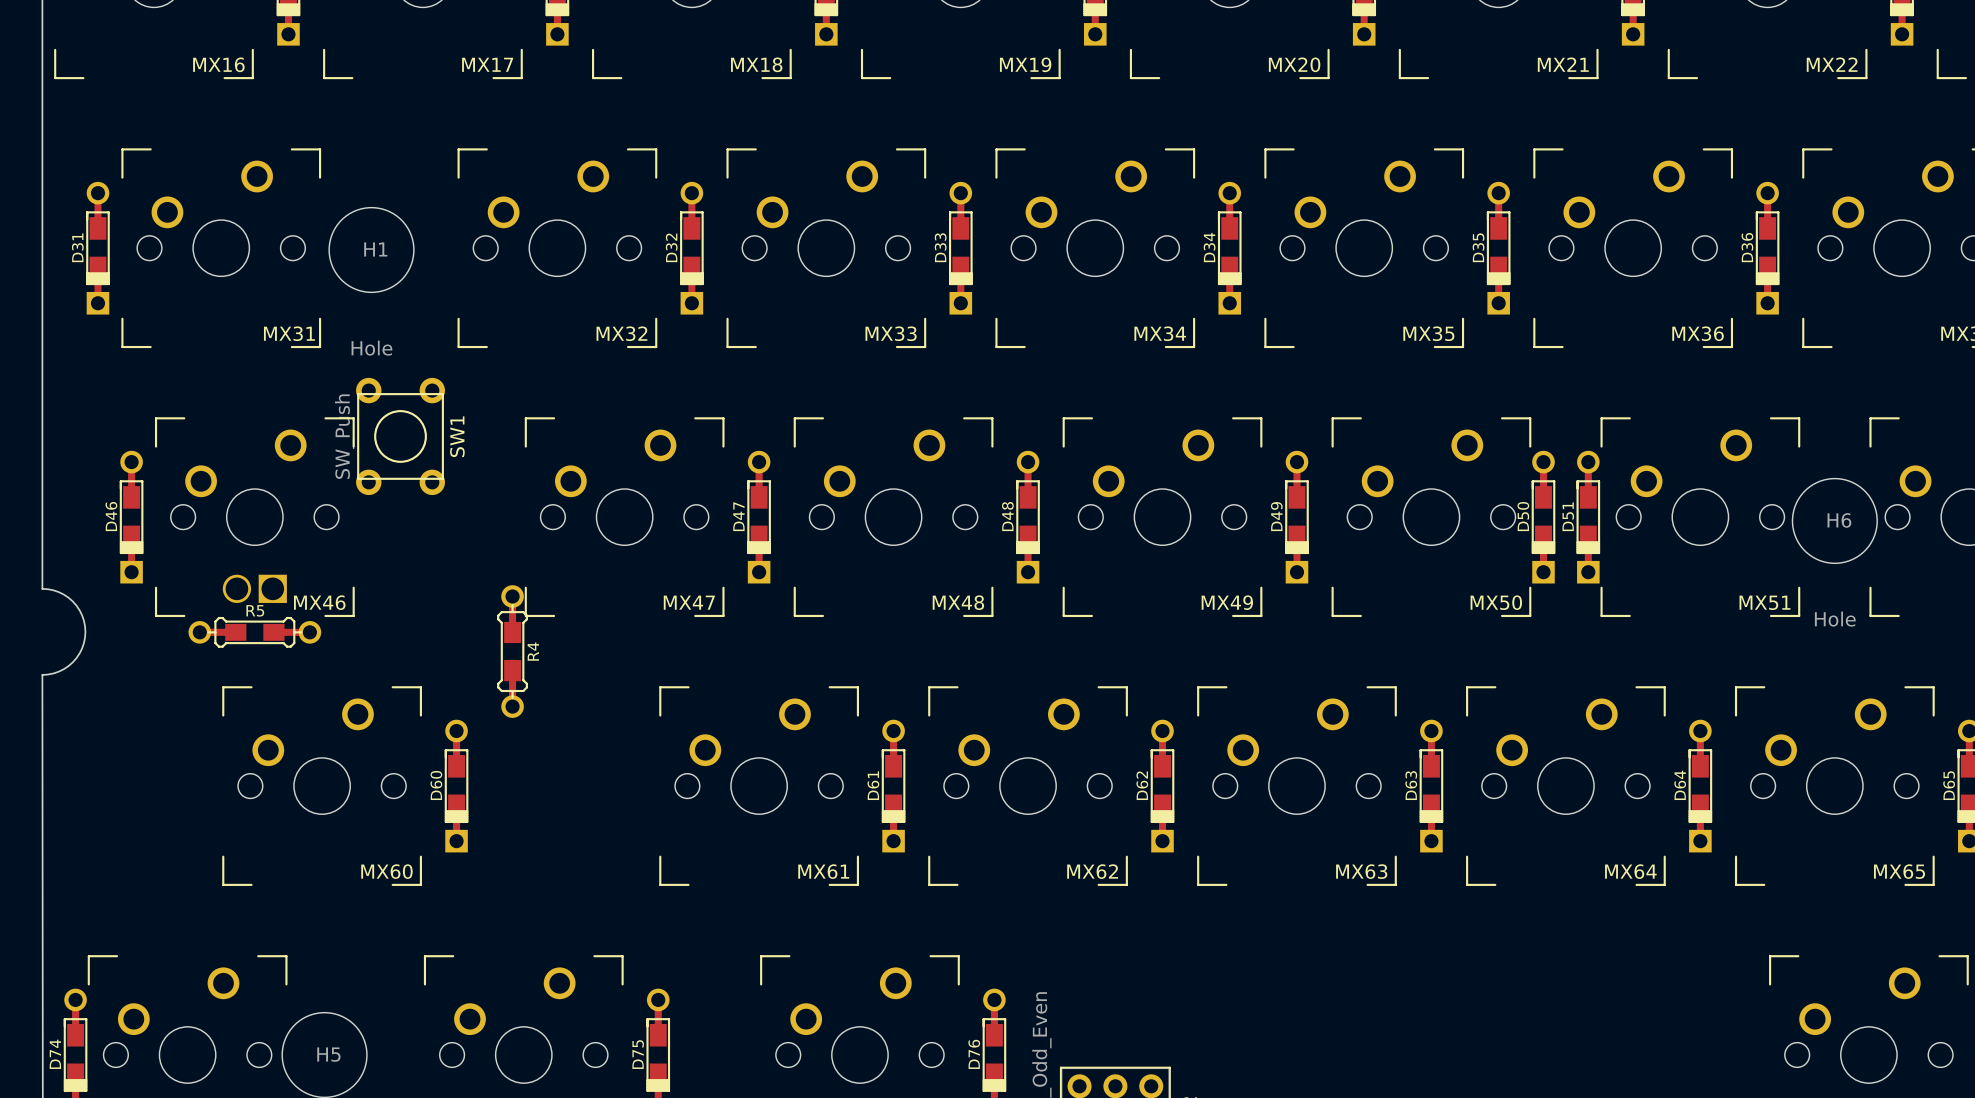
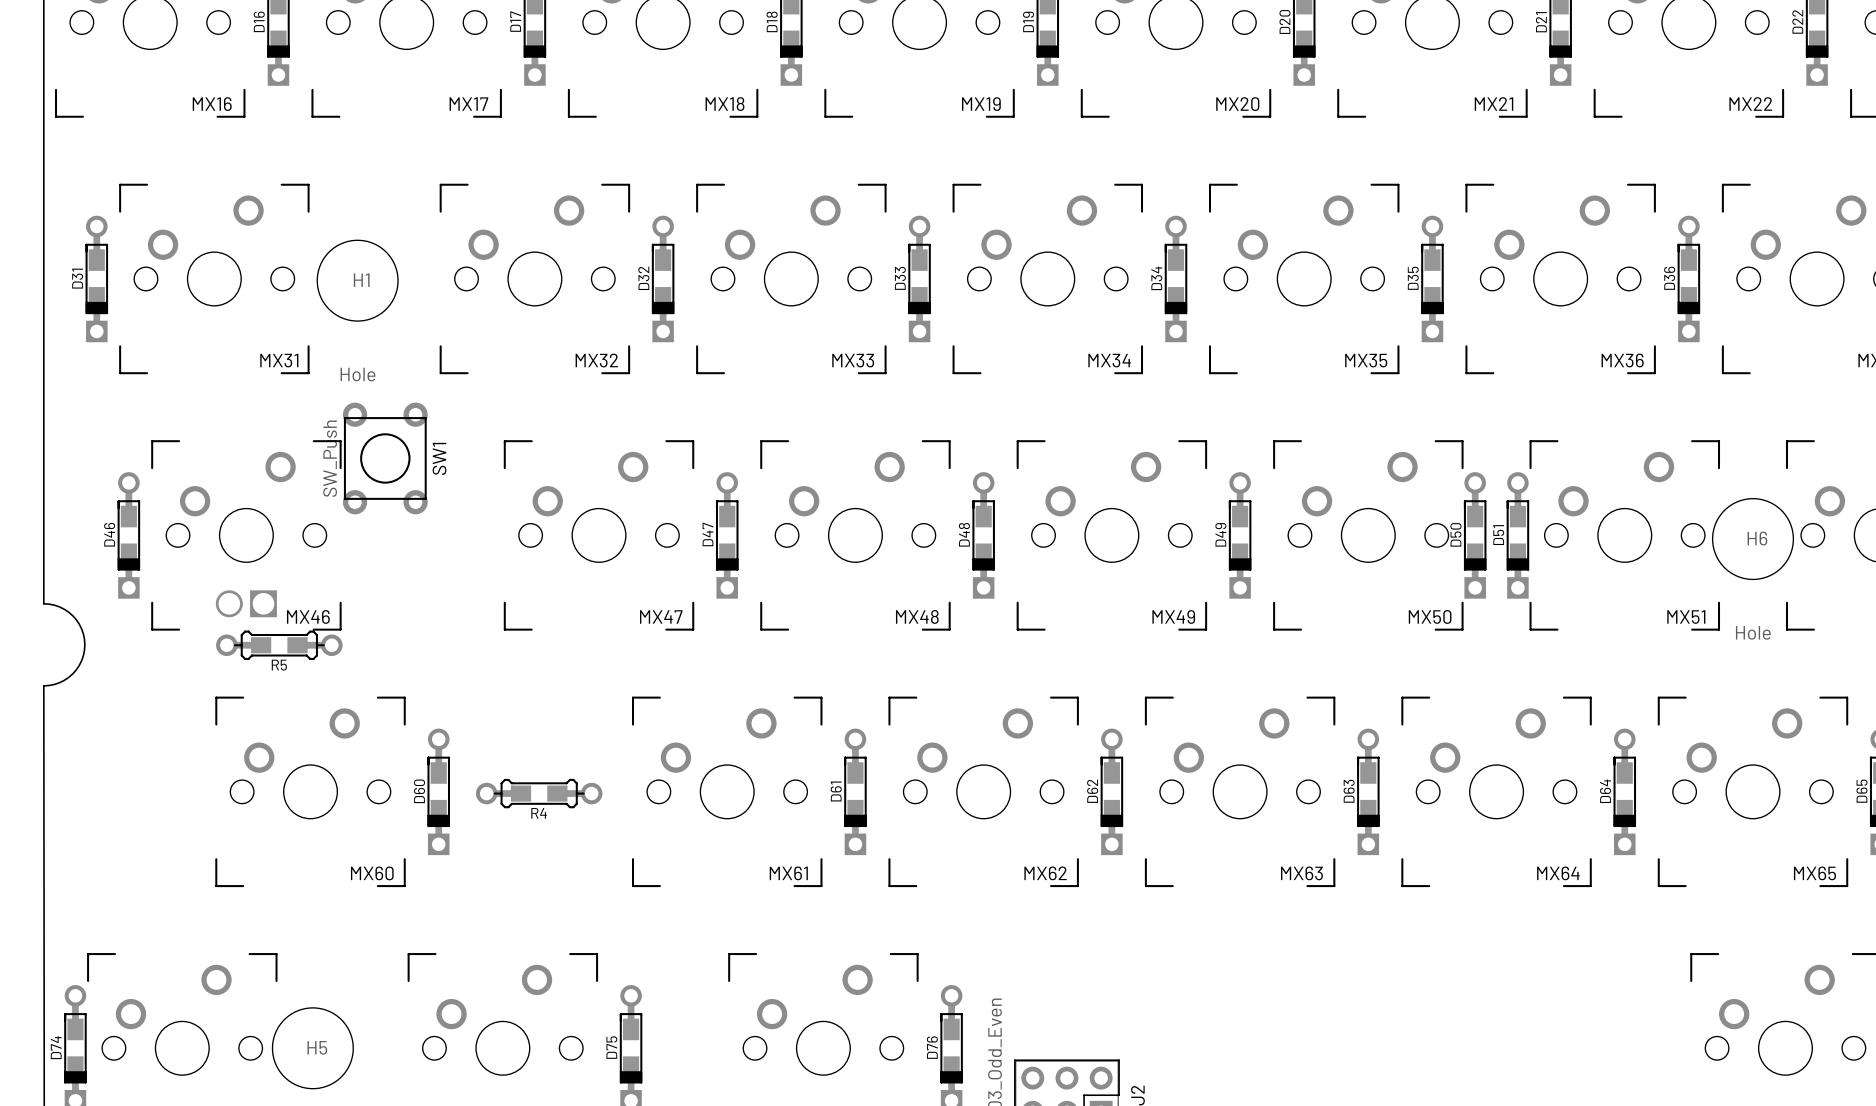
R5 name position: R5 (255, 610) -> R5 (279, 665)
R5 position: (254, 632) -> (279, 645)
R4 rotation: 0° (512, 651) -> 90° clockwise (539, 793)
R4 position: (512, 651) -> (539, 793)

